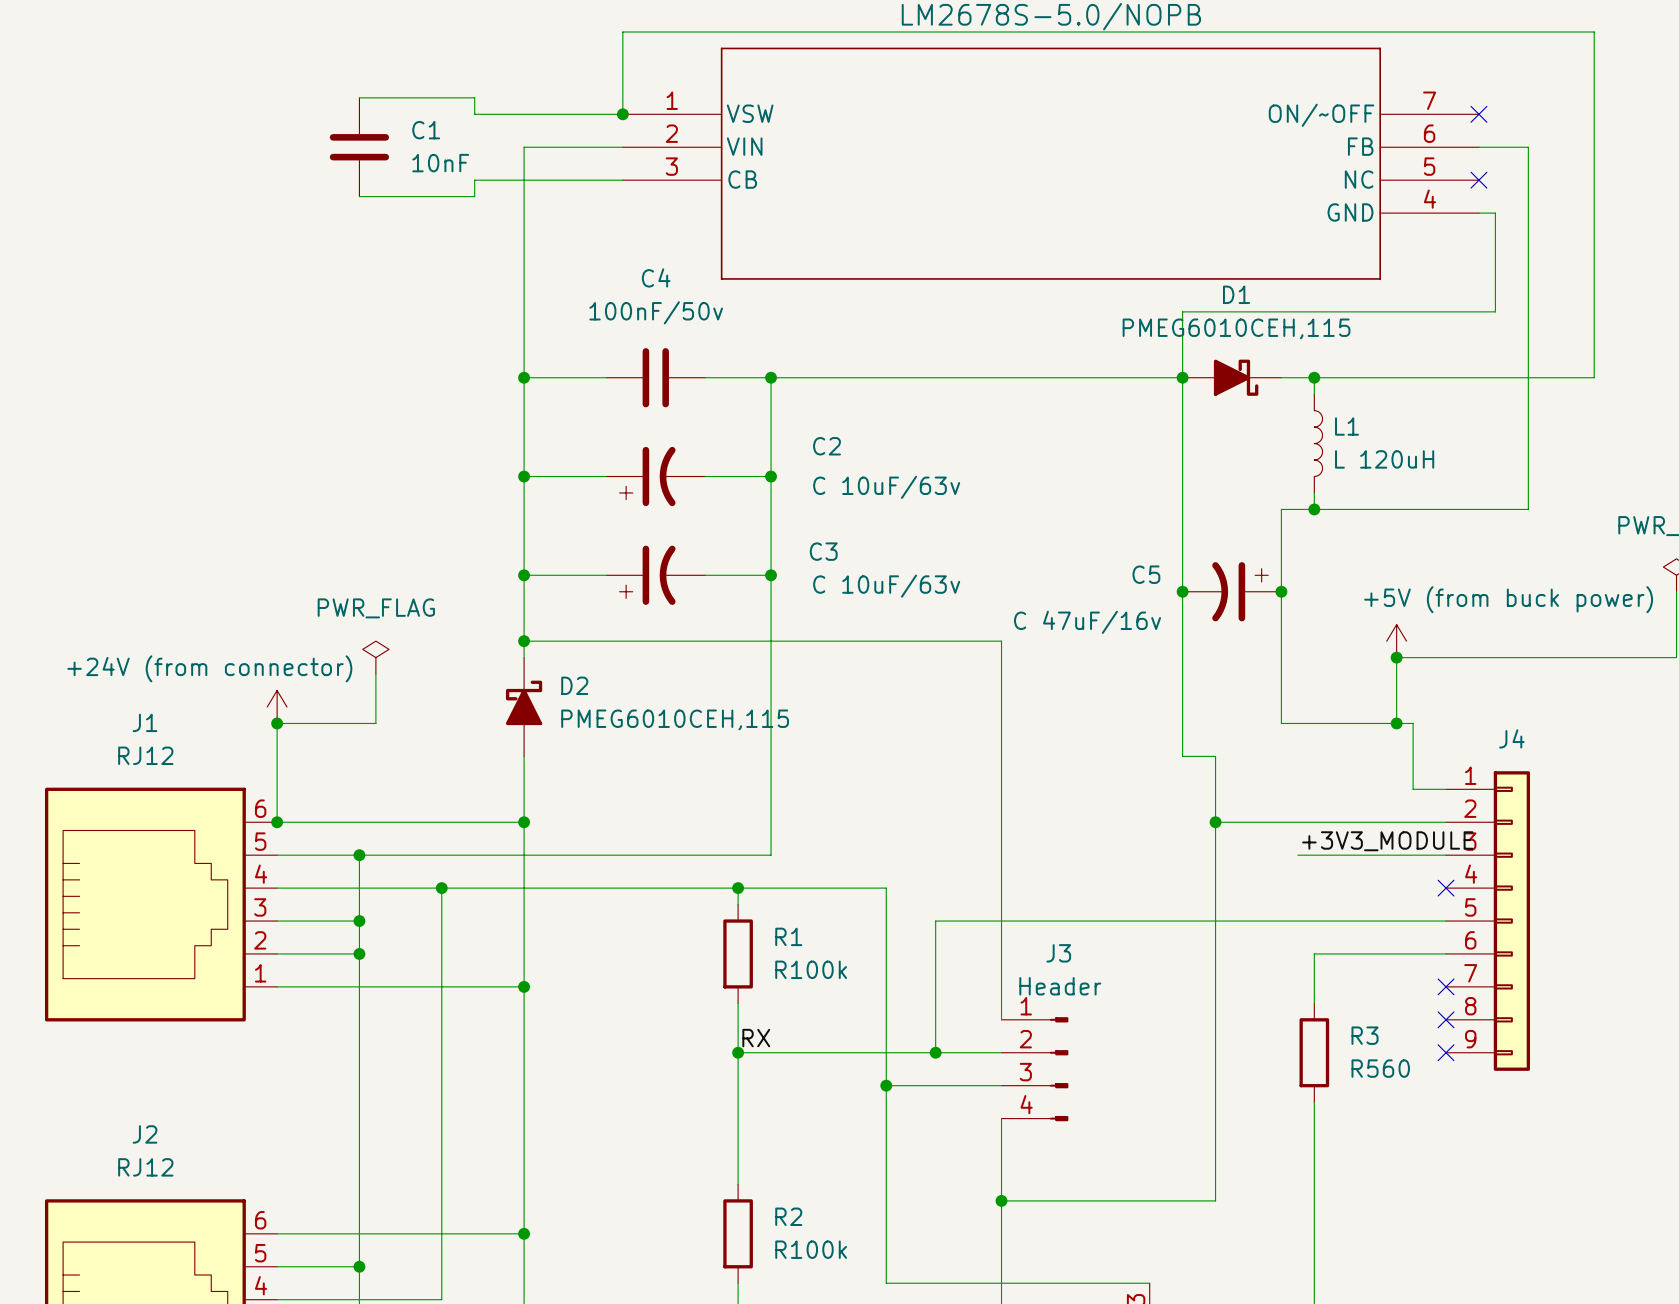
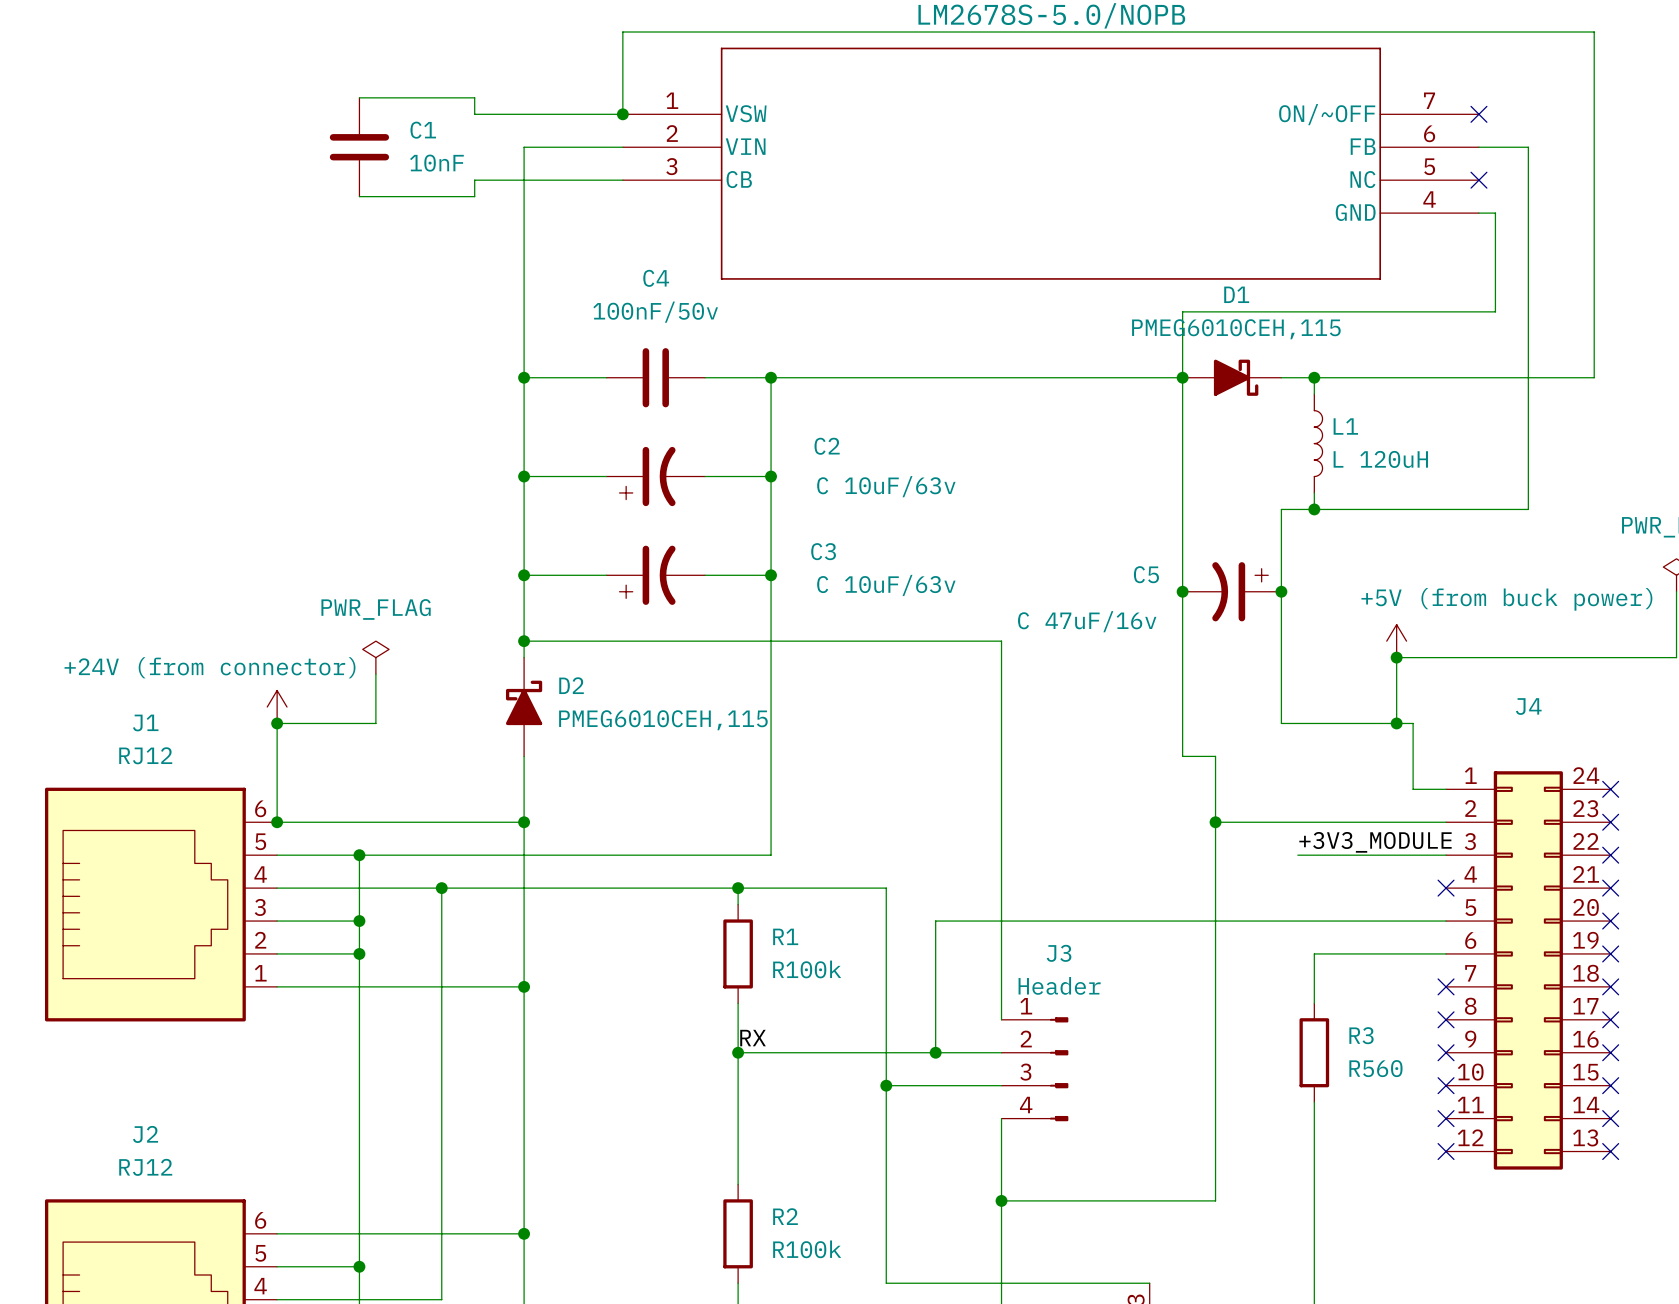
J4 name position: J4 (1511, 738) -> J4 (1528, 706)
J4 symbol: [1446, 771, 1531, 1071] -> [1446, 771, 1611, 1170]
no-connect mark: none -> (1610, 789)
no-connect mark: none -> (1610, 822)
no-connect mark: none -> (1610, 855)
no-connect mark: none -> (1610, 888)
no-connect mark: none -> (1610, 921)
no-connect mark: none -> (1610, 953)
no-connect mark: none -> (1610, 986)
no-connect mark: none -> (1610, 1019)
no-connect mark: none -> (1610, 1052)
no-connect mark: none -> (1446, 1085)
no-connect mark: none -> (1610, 1085)
no-connect mark: none -> (1446, 1118)
no-connect mark: none -> (1610, 1118)
no-connect mark: none -> (1446, 1151)
no-connect mark: none -> (1610, 1151)

